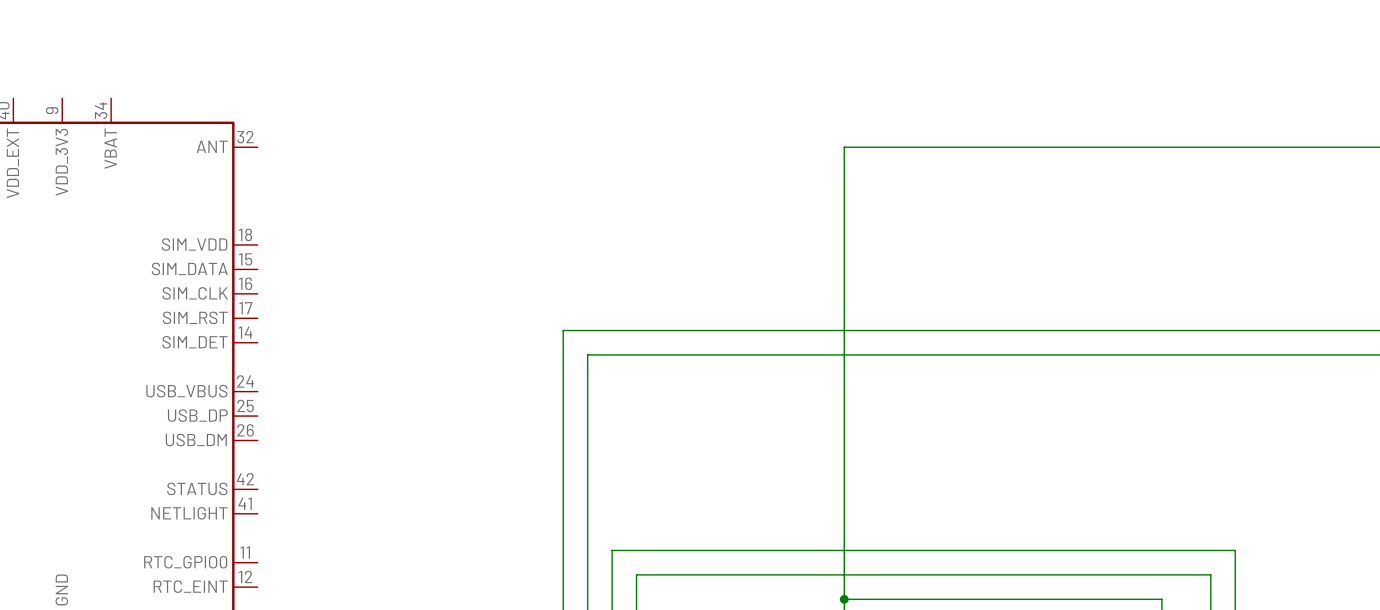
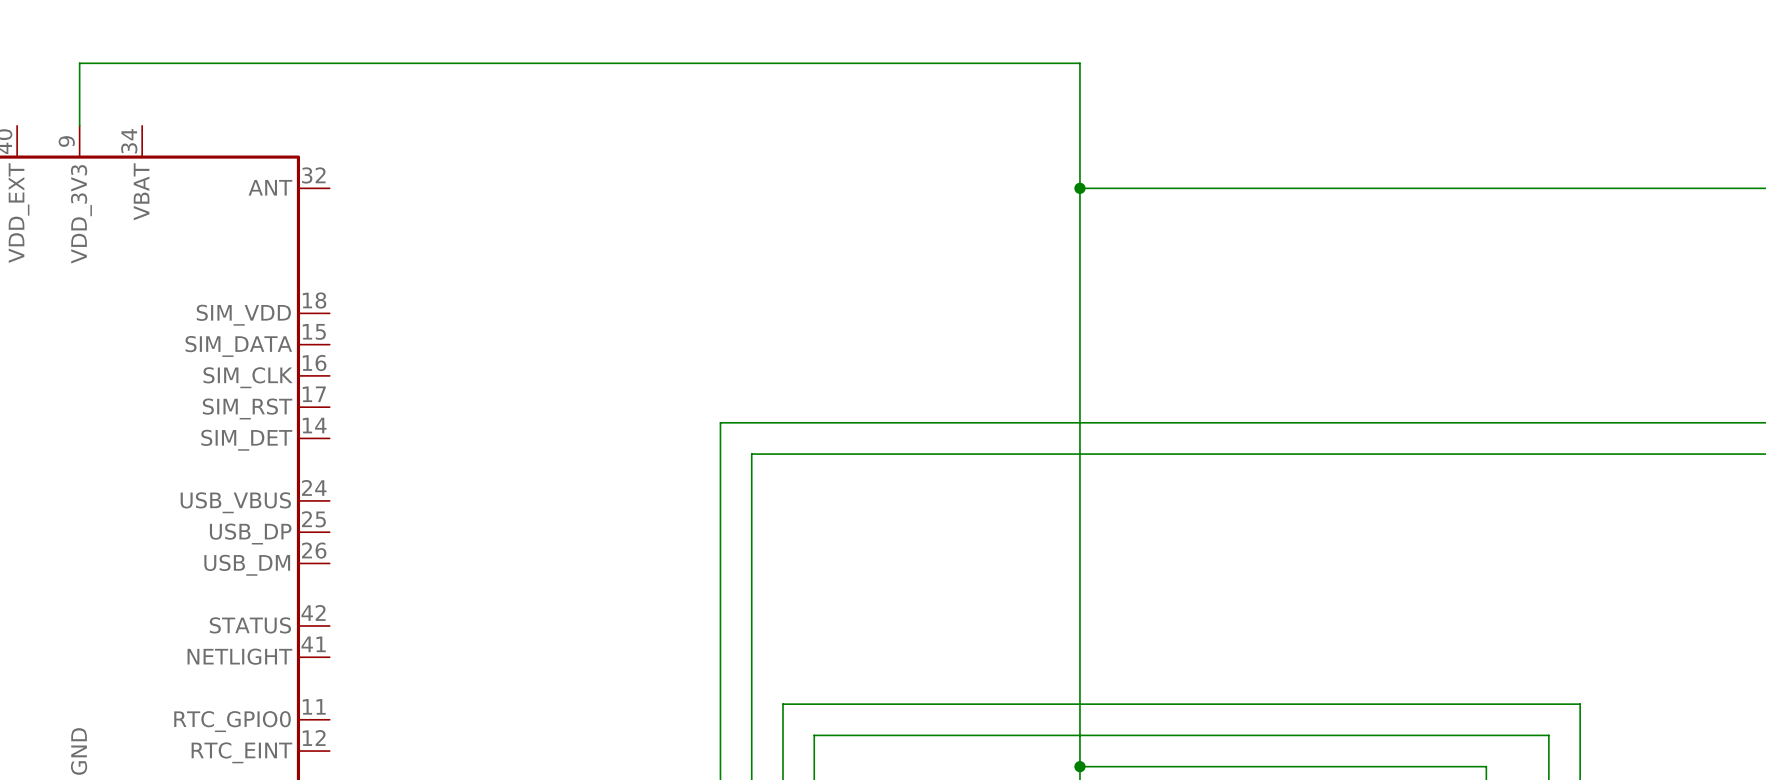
wire: none -> (79, 125) (79, 63) (1079, 63) (1079, 188)
junction: none -> (1079, 188)

